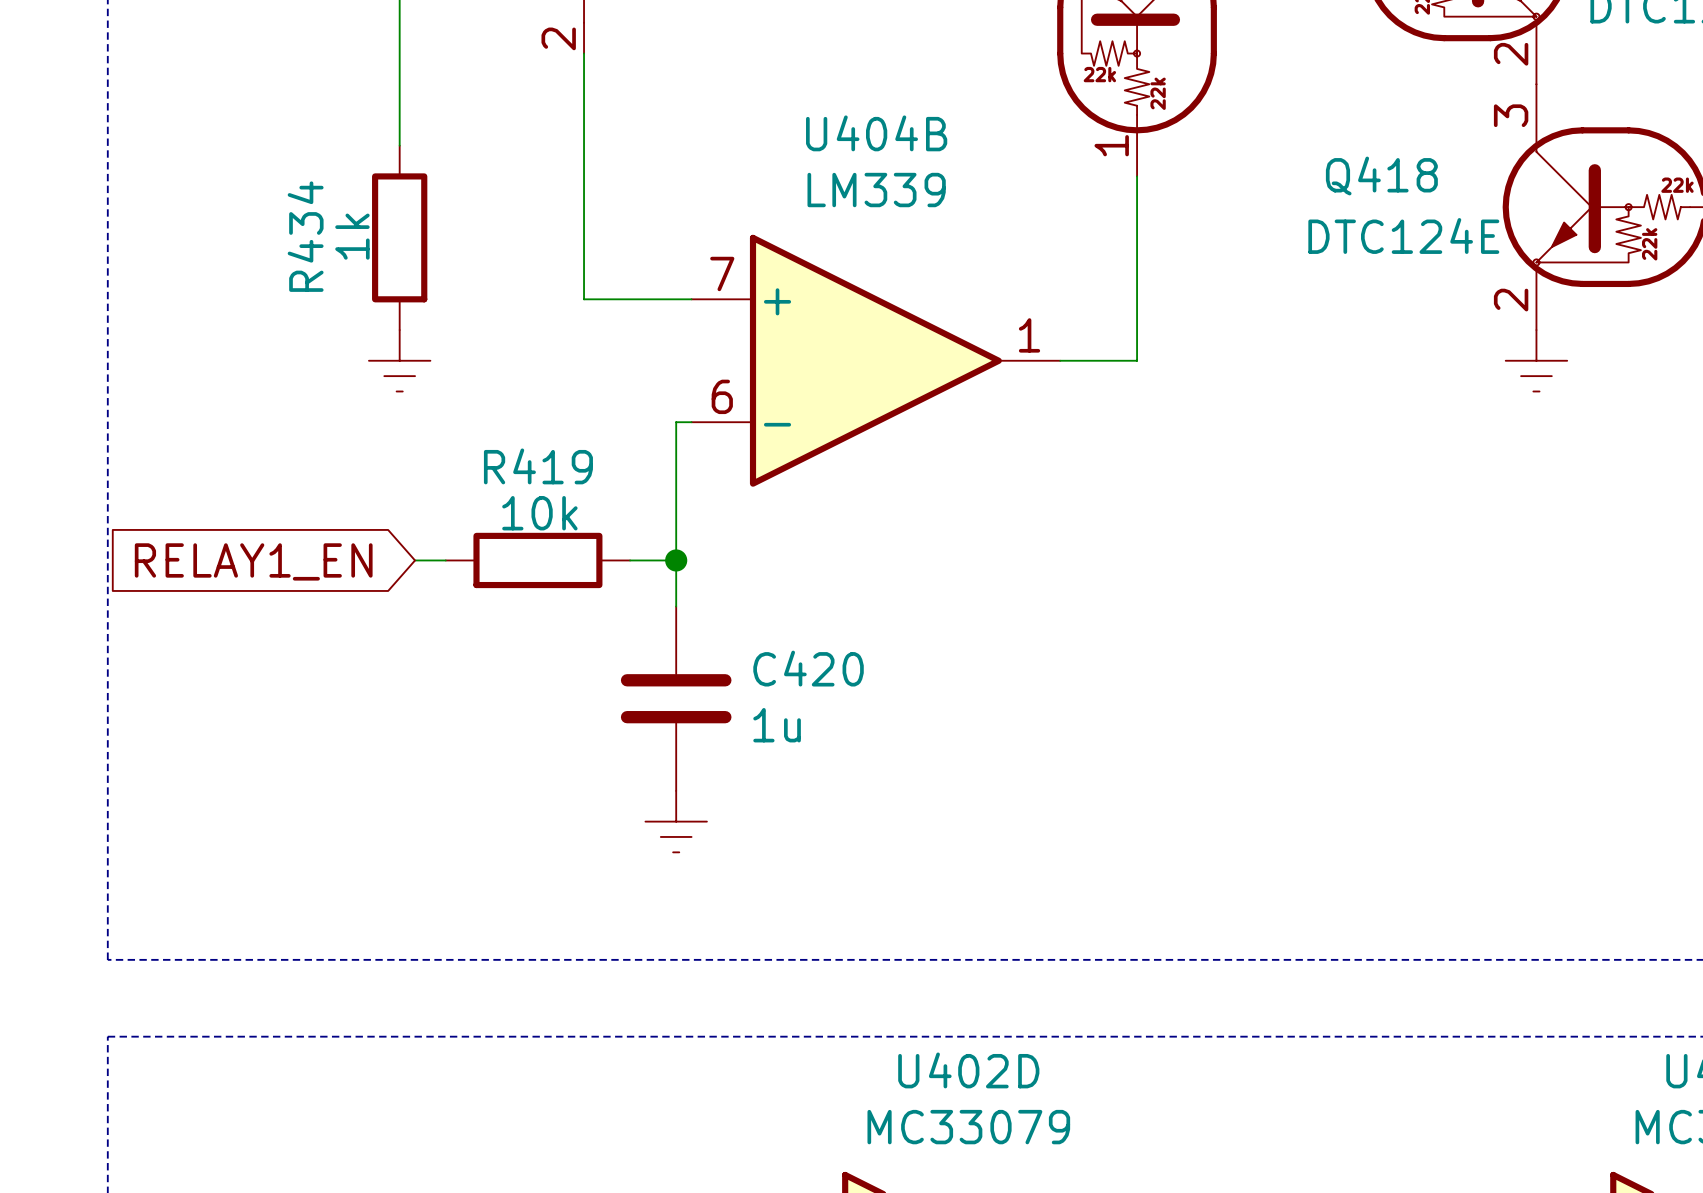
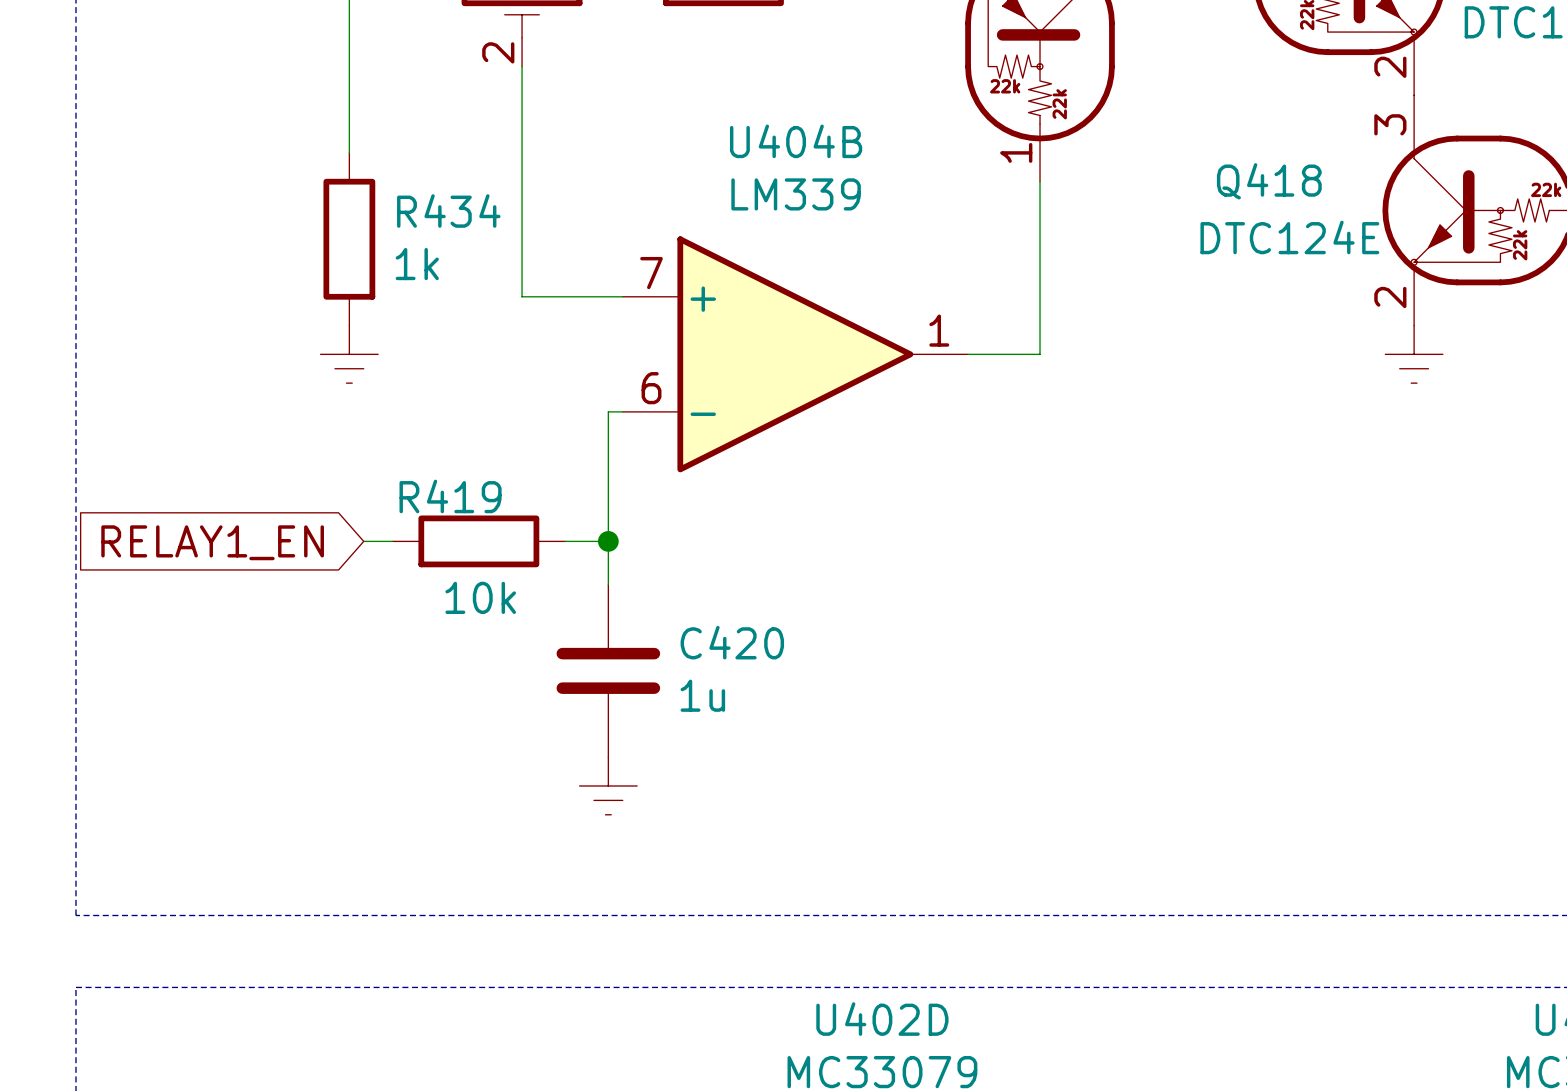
R434 name rotation: 0° (305, 236) -> 90° clockwise (448, 211)
R434 name position: R434 (305, 236) -> R434 (448, 211)
R434 value rotation: 0° (352, 236) -> 90° clockwise (417, 264)
R434 value position: 1k (352, 236) -> 1k (417, 264)
R419 name position: R419 (538, 466) -> R419 (450, 496)
R419 value position: 10k (539, 513) -> 10k (480, 597)

